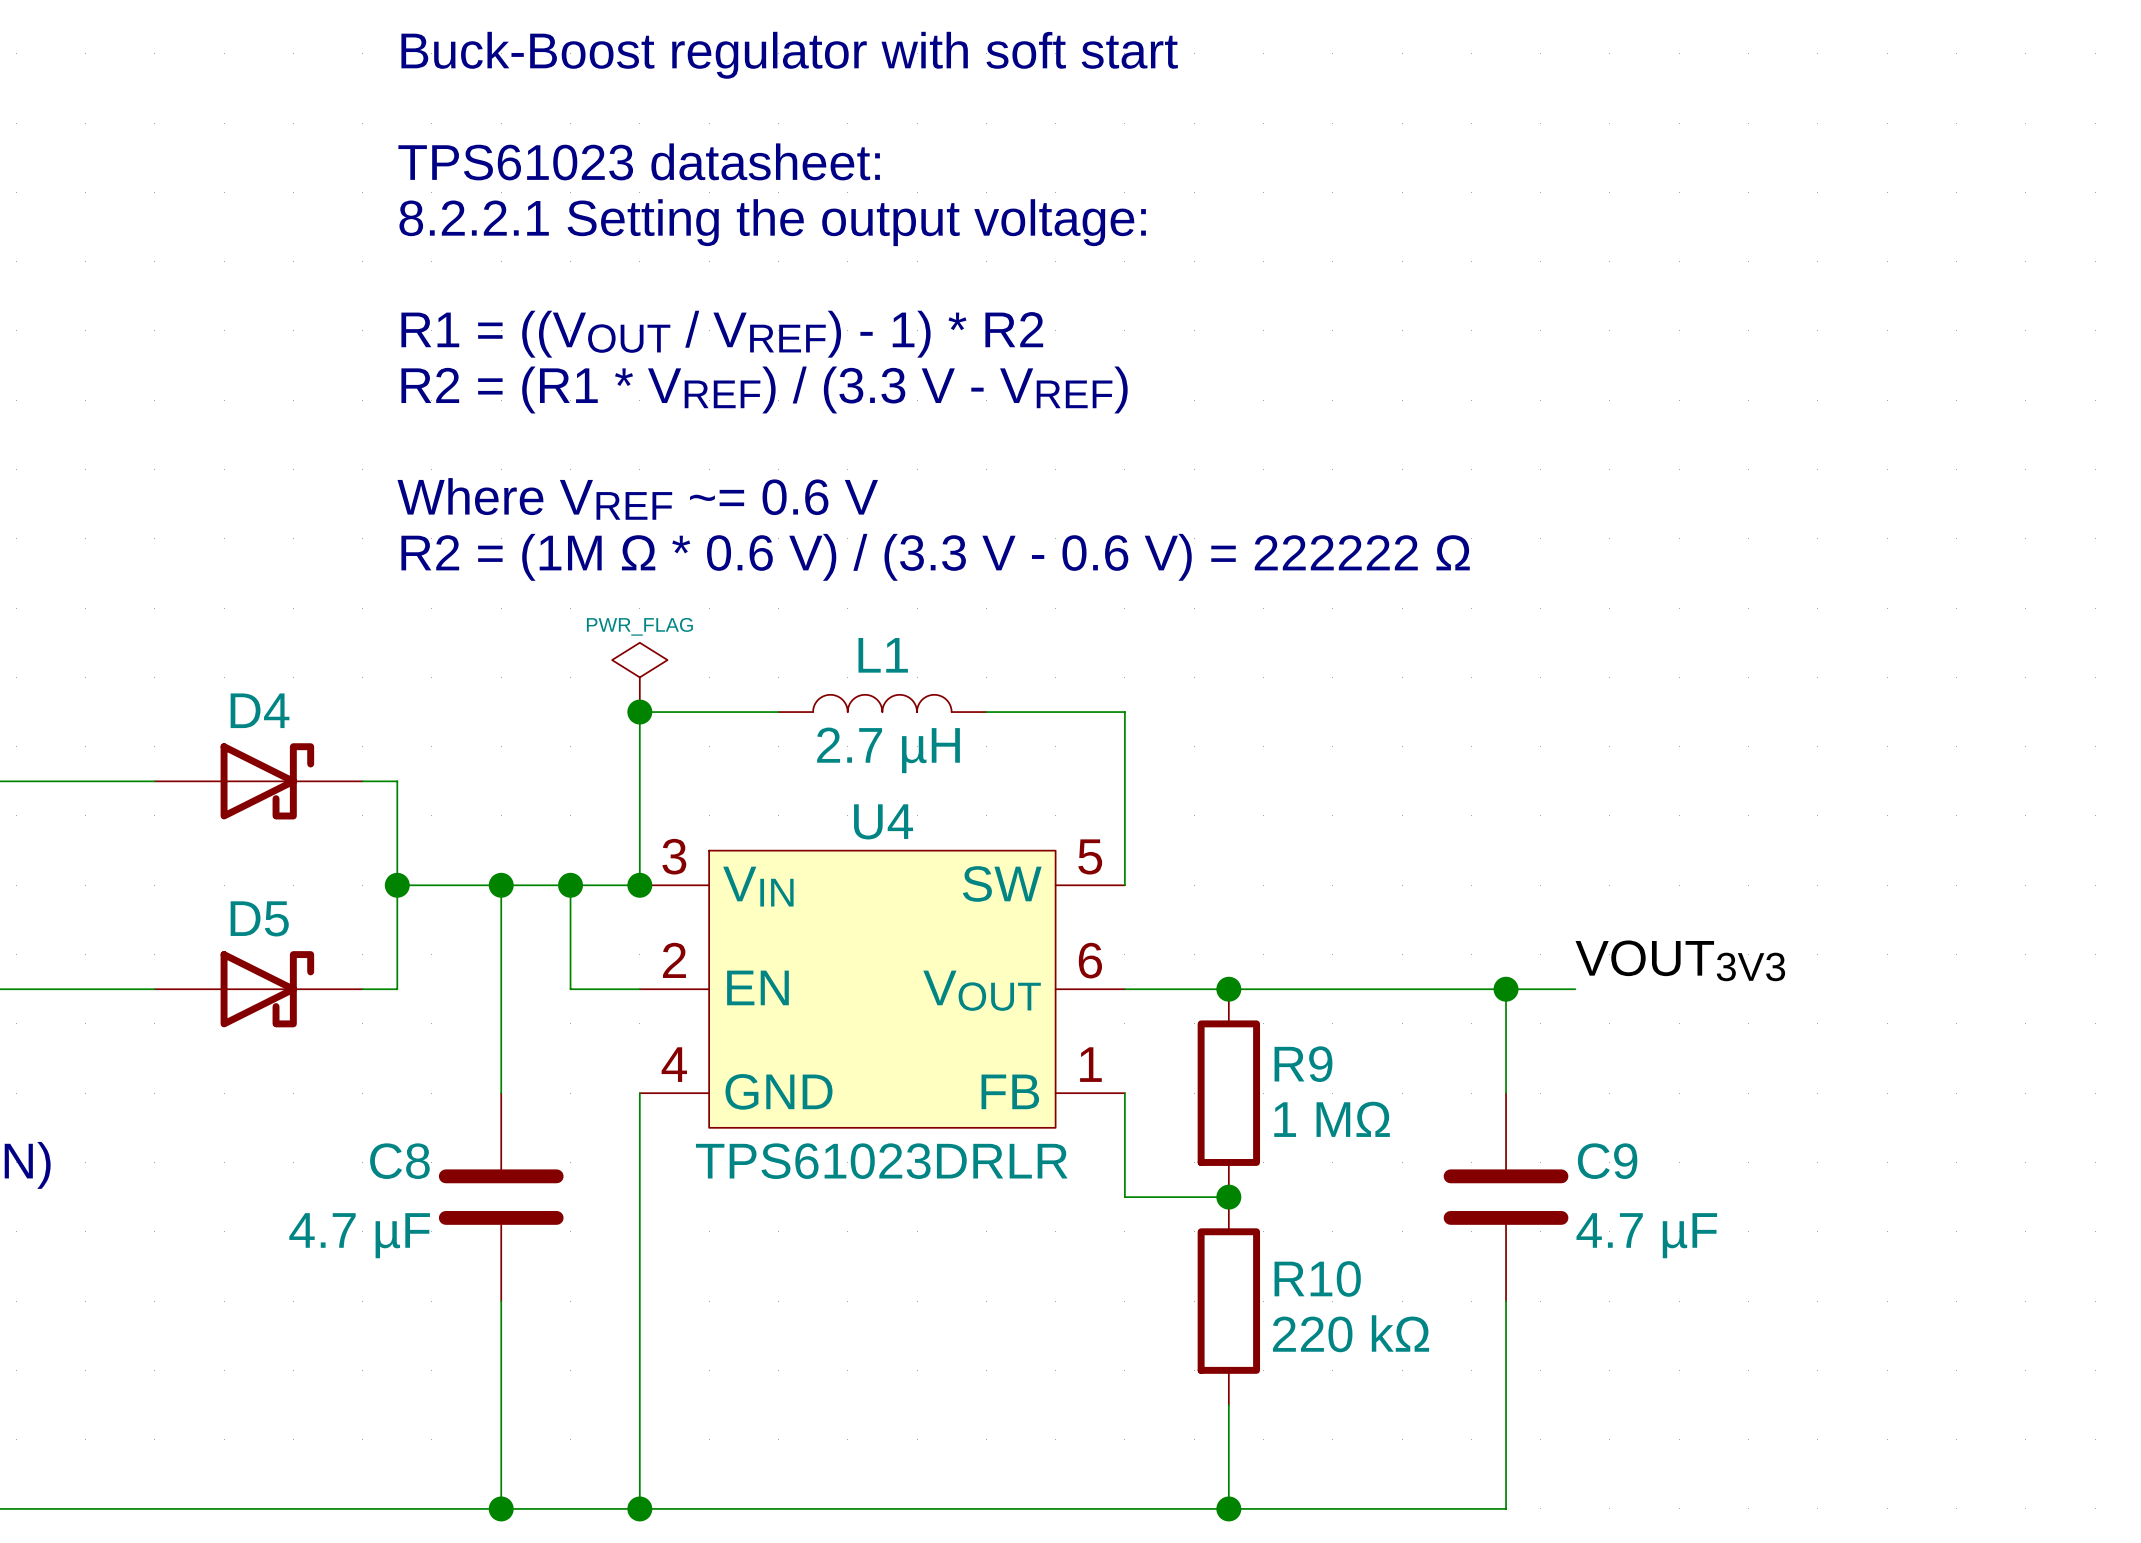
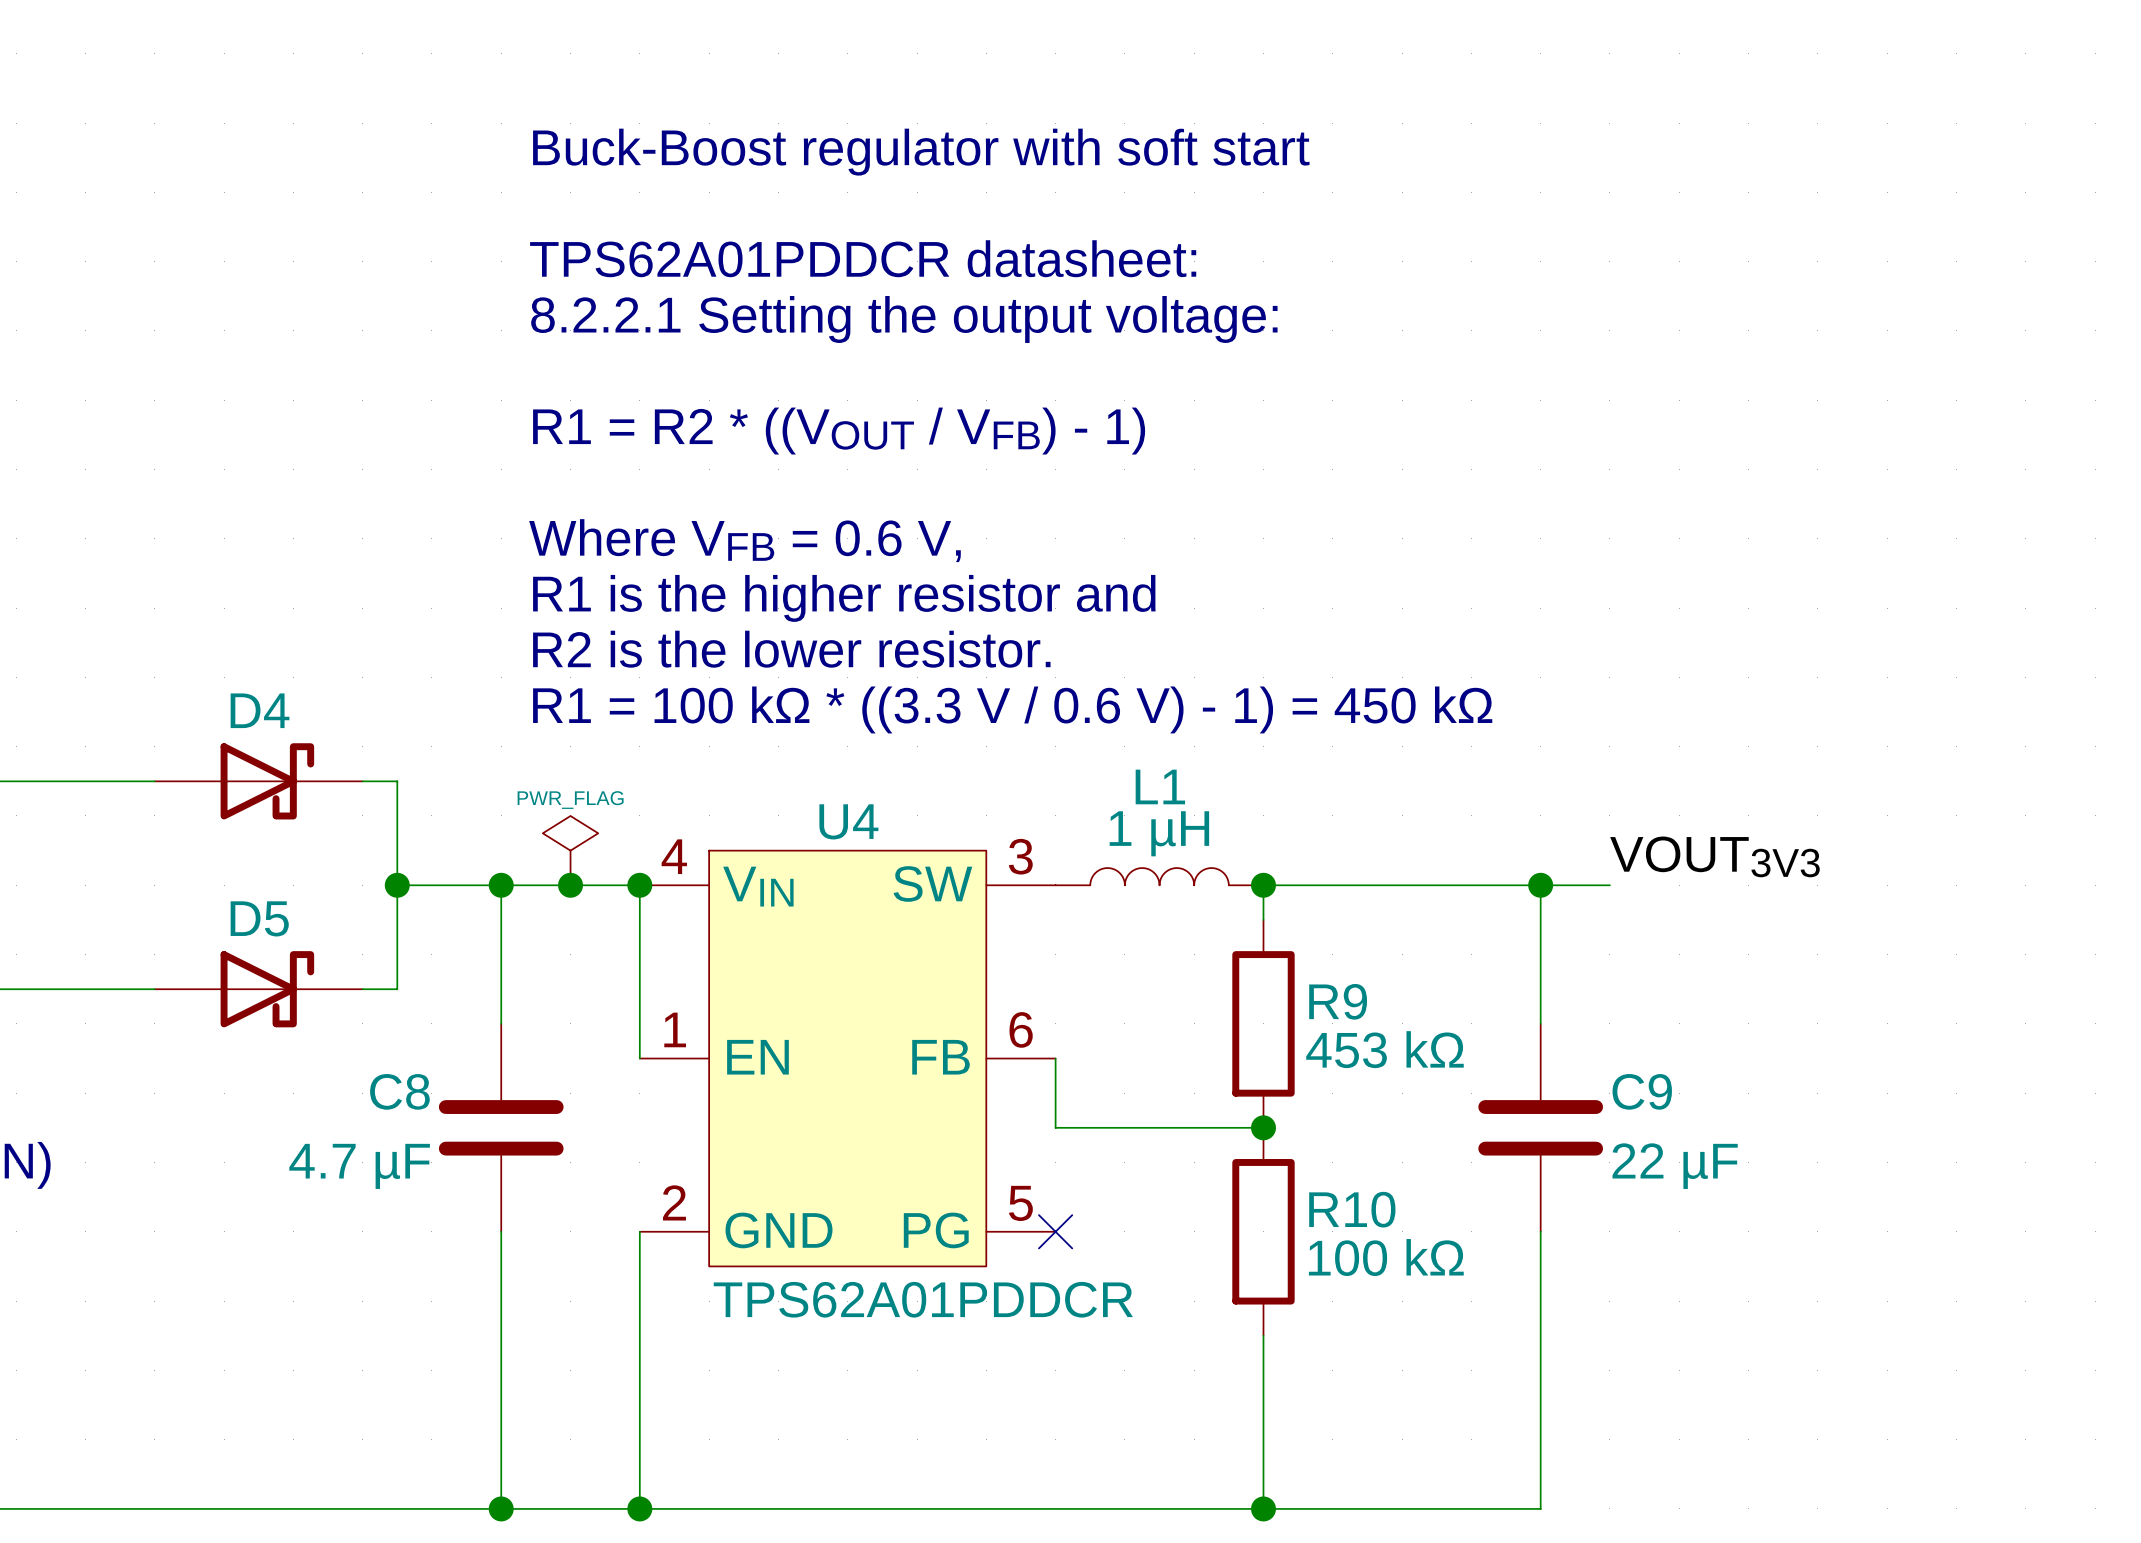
text position: Buck-Boost regulator with soft start (789, 55) -> Buck-Boost regulator with soft start (921, 152)
text: TPS61023 datasheet: (639, 161) -> none
text position: 8.2.2.1 Setting the output voltage: (772, 222) -> 8.2.2.1 Setting the output voltage: (904, 319)
text: none -> TPS62A01PDDCR datasheet: (863, 258)
text: R1 = ((VOUT / VREF) - 1) * R2 (722, 334) -> none
text: R2 = (R1 * VREF) / (3.3 V - VREF) (764, 389) -> none
text: none -> R1 = R2 * ((VOUT / VFB) - 1) (839, 431)
text: Where VREF ~= 0.6 V (637, 498) -> Where VFB = 0.6 V, (744, 540)
text: R2 = (1M Ω * 0.6 V) / (3.3 V - 0.6 V) = 222222 Ω (935, 557) -> none
text: none -> R1 is the higher resistor and (844, 598)
text: none -> R2 is the lower resistor. (791, 649)
L1 name position: L1 (883, 655) -> L1 (1160, 786)
power symbol position: PWR_FLAG (639, 677) -> PWR_FLAG (570, 850)
L1 position: (882, 703) -> (1159, 876)
text: none -> R1 = 100 kΩ * ((3.3 V / 0.6 V) - 1) = 450 kΩ (1012, 709)
junction: (639, 712) -> none
wire: (778, 712) (639, 712) (639, 885) -> (639, 1058) (639, 885)
wire: (986, 712) (1124, 712) (1124, 885) -> none
L1 value: 2.7 µH (888, 750) -> 1 µH (1159, 833)
U4 name position: U4 (883, 821) -> U4 (848, 821)
U4 symbol: [639, 850, 1125, 1128] -> [639, 850, 1056, 1267]
wire: (570, 885) (570, 989) (639, 989) -> none
junction: none -> (1263, 885)
wire: none -> (1540, 885) (1540, 1023)
wire: none -> (1609, 885) (1263, 885) (1263, 919)
label position: VOUT3V3 (1680, 960) -> VOUT3V3 (1714, 856)
wire: (1124, 989) (1575, 989) -> none
junction: (1228, 989) -> none
wire: (1506, 989) (1506, 1093) -> none
junction position: (1506, 989) -> (1540, 885)
wire: none -> (1055, 1058) (1055, 1127) (1263, 1127)
R9 name position: R9 (1303, 1064) -> R9 (1338, 1001)
wire: (639, 1093) (639, 1231) -> none
wire: (1124, 1093) (1124, 1197) (1228, 1197) -> none
R9 position: (1228, 1093) -> (1263, 1023)
R9 value: 1 MΩ (1332, 1119) -> 453 kΩ (1384, 1049)
junction: none -> (1263, 1127)
U4 value: TPS61023DRLR (881, 1161) -> TPS62A01PDDCR (923, 1299)
C8 position: (501, 1197) -> (501, 1127)
junction: (1228, 1197) -> none
C9 position: (1506, 1197) -> (1540, 1127)
no-connect mark: none -> (1055, 1231)
C9 value: 4.7 µF (1646, 1235) -> 22 µF (1675, 1166)
R10 position: (1228, 1301) -> (1263, 1231)
wire: (1506, 1301) (1506, 1508) -> (1540, 1231) (1540, 1508) (1506, 1508)
R10 value: 220 kΩ (1351, 1333) -> 100 kΩ (1386, 1257)
wire: none -> (1263, 1335) (1263, 1508)
wire: (1228, 1405) (1228, 1508) -> none
junction position: (1228, 1508) -> (1263, 1508)

